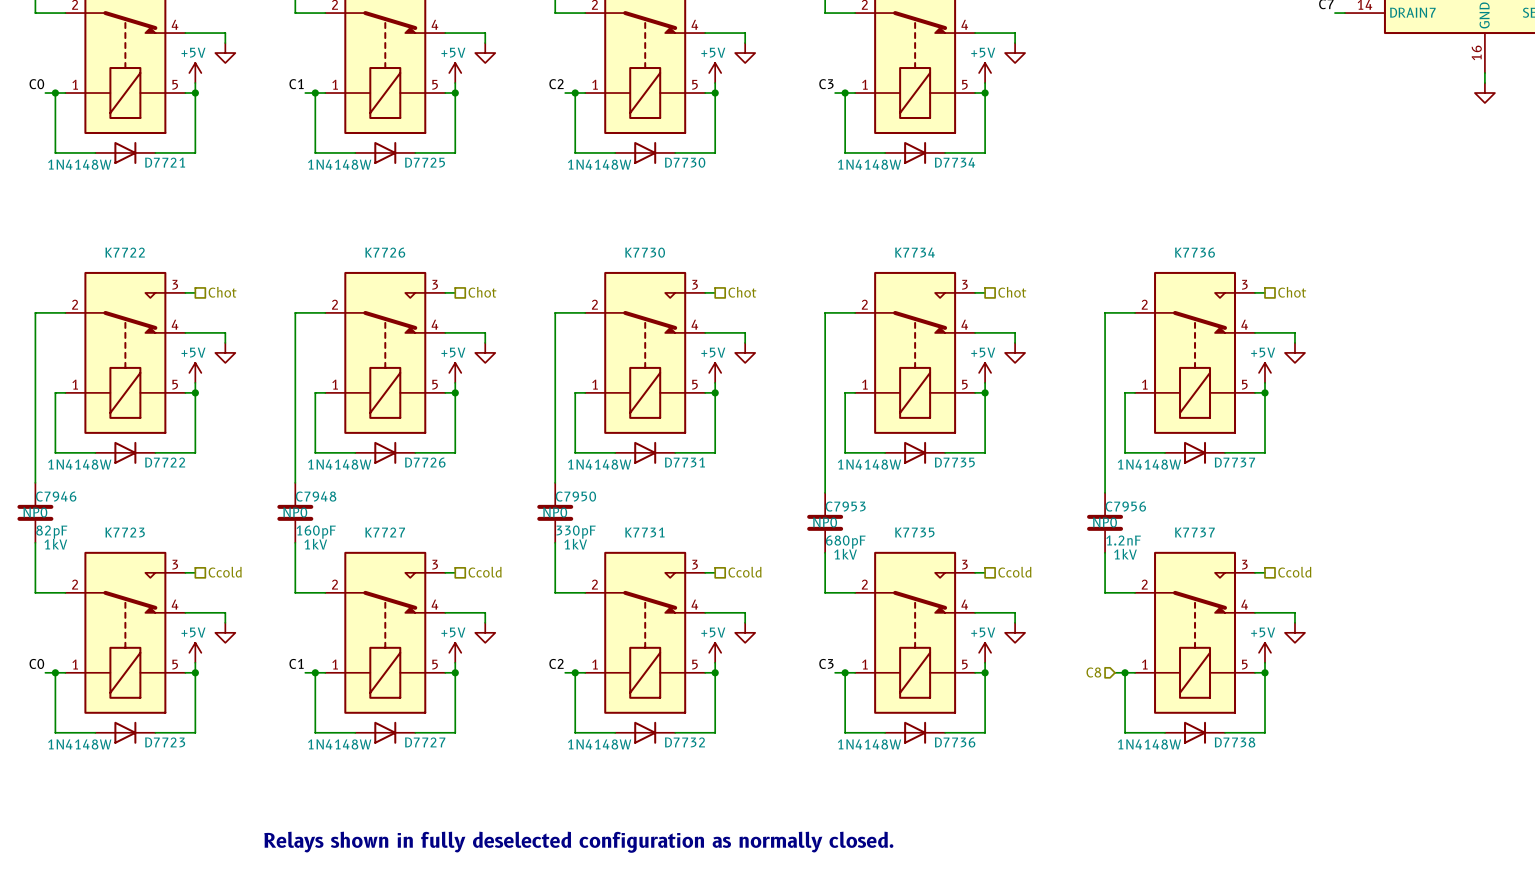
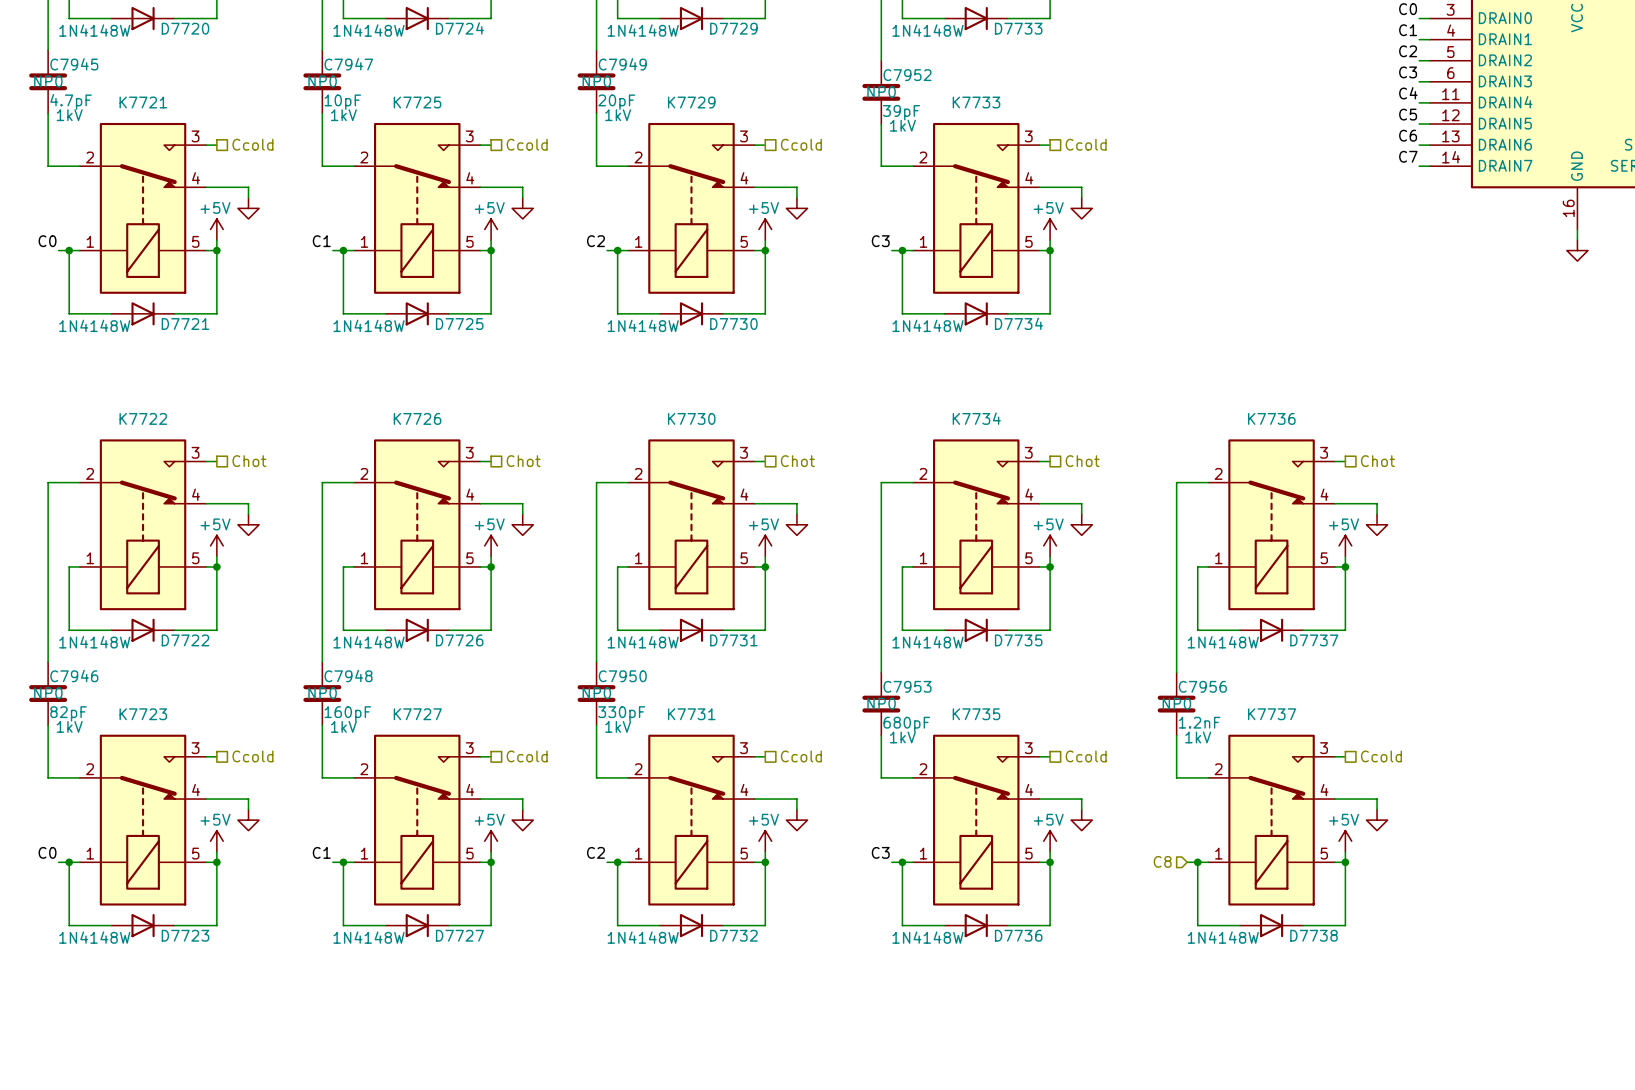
text: Relays shown in fully deselected configuration as normally closed. (578, 842) -> none

